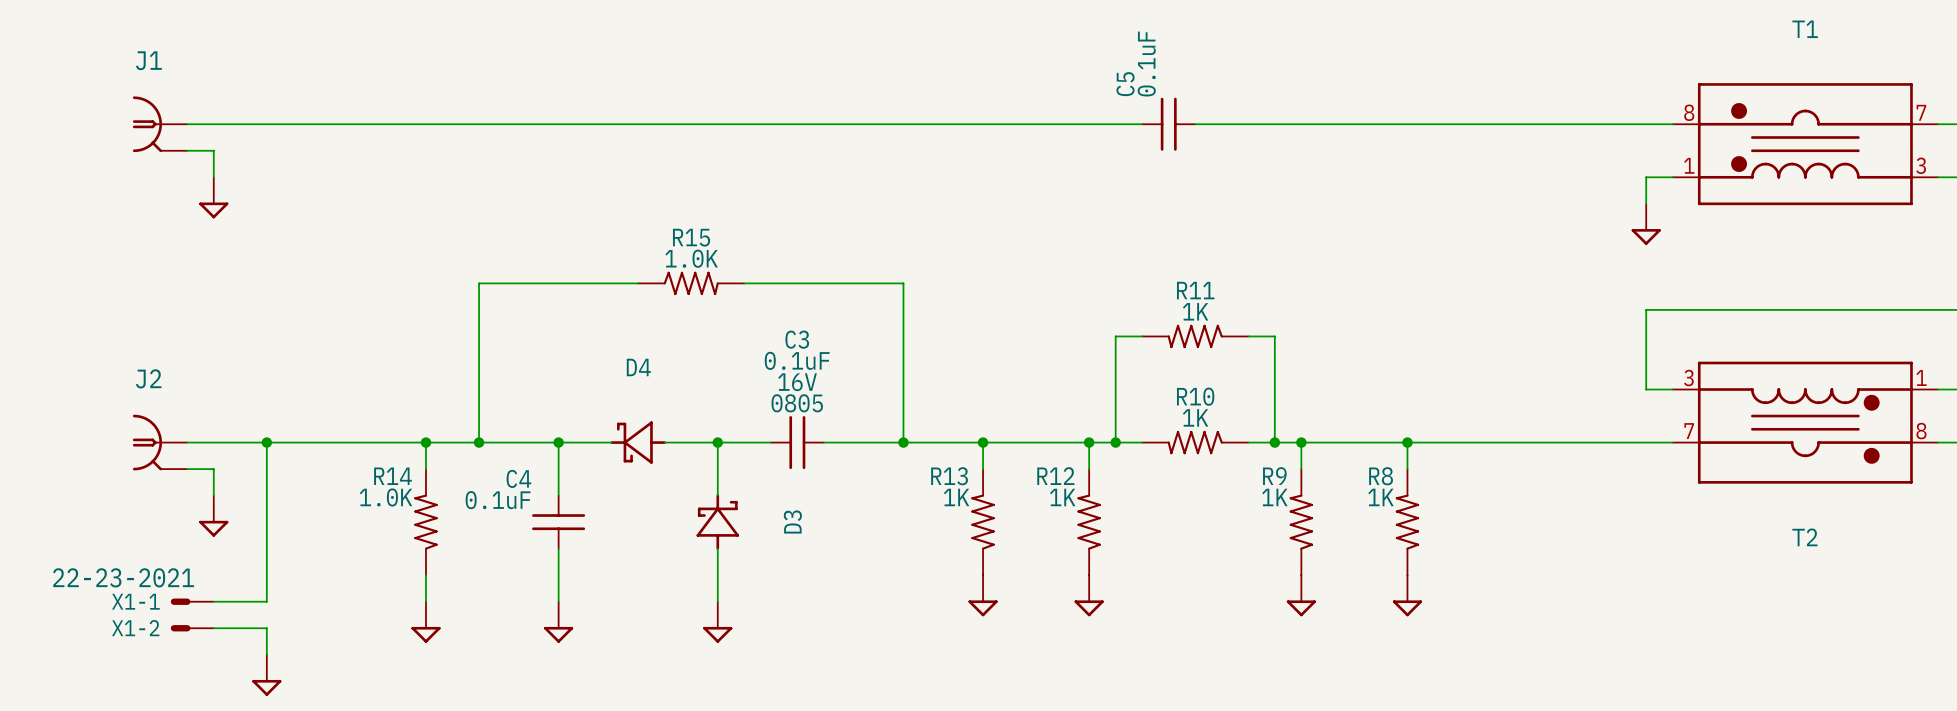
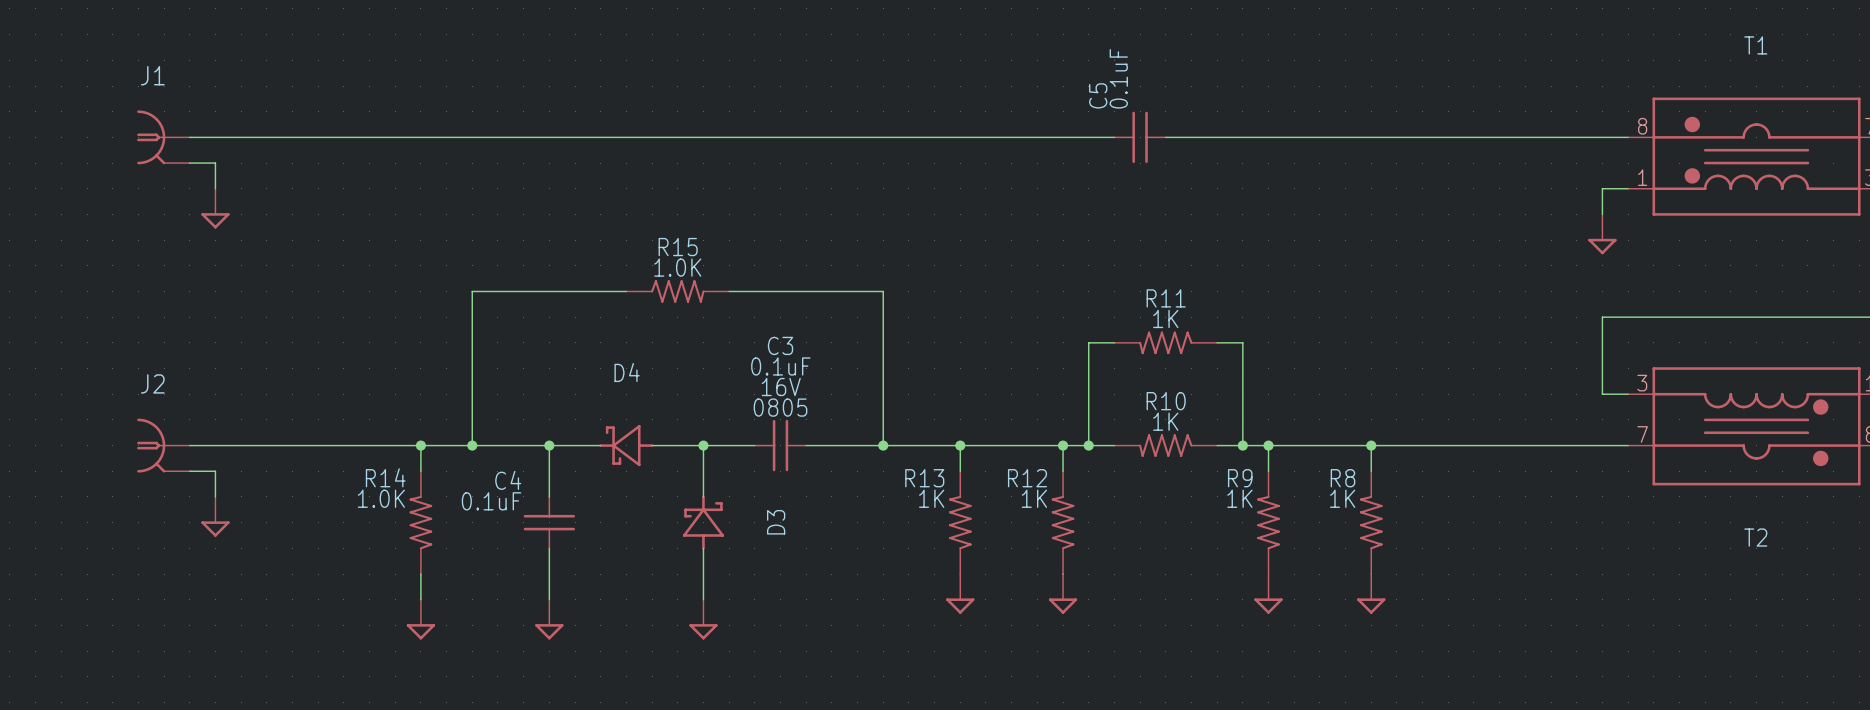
wire: (266, 442) (266, 601) (213, 601) -> none
junction: (266, 442) -> none
X1-1: 22-23-2021 (192, 601) -> none
X1-2: (192, 628) -> none
wire: (213, 628) (266, 628) (266, 654) -> none
power symbol: (266, 675) -> none

